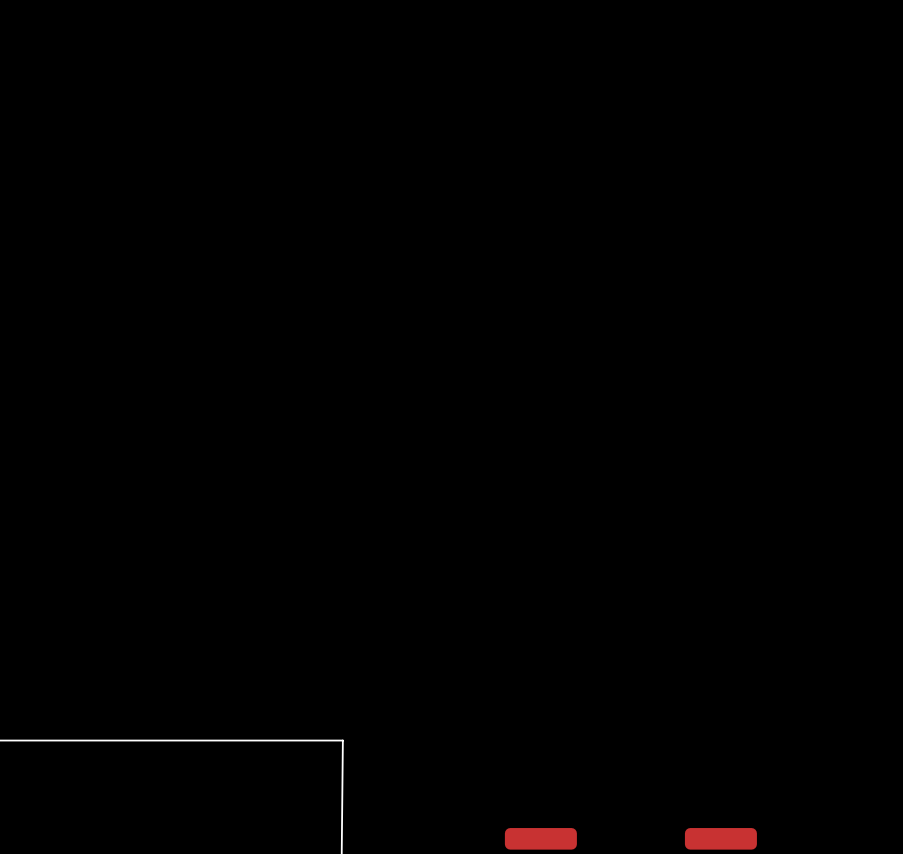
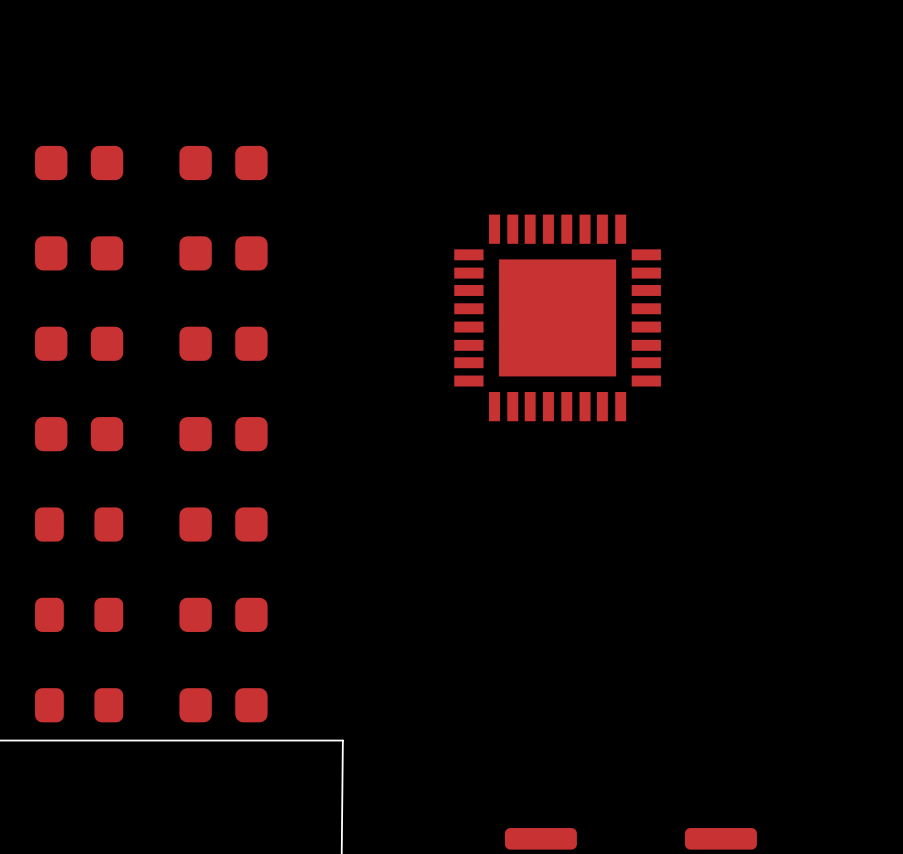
part: none -> (79, 163)
part: none -> (223, 163)
part: none -> (79, 253)
part: none -> (223, 253)
part: none -> (557, 317)
part: none -> (79, 343)
part: none -> (223, 343)
part: none -> (79, 434)
part: none -> (223, 434)
part: none -> (79, 524)
part: none -> (223, 524)
part: none -> (79, 614)
part: none -> (223, 614)
part: none -> (79, 705)
part: none -> (223, 705)

